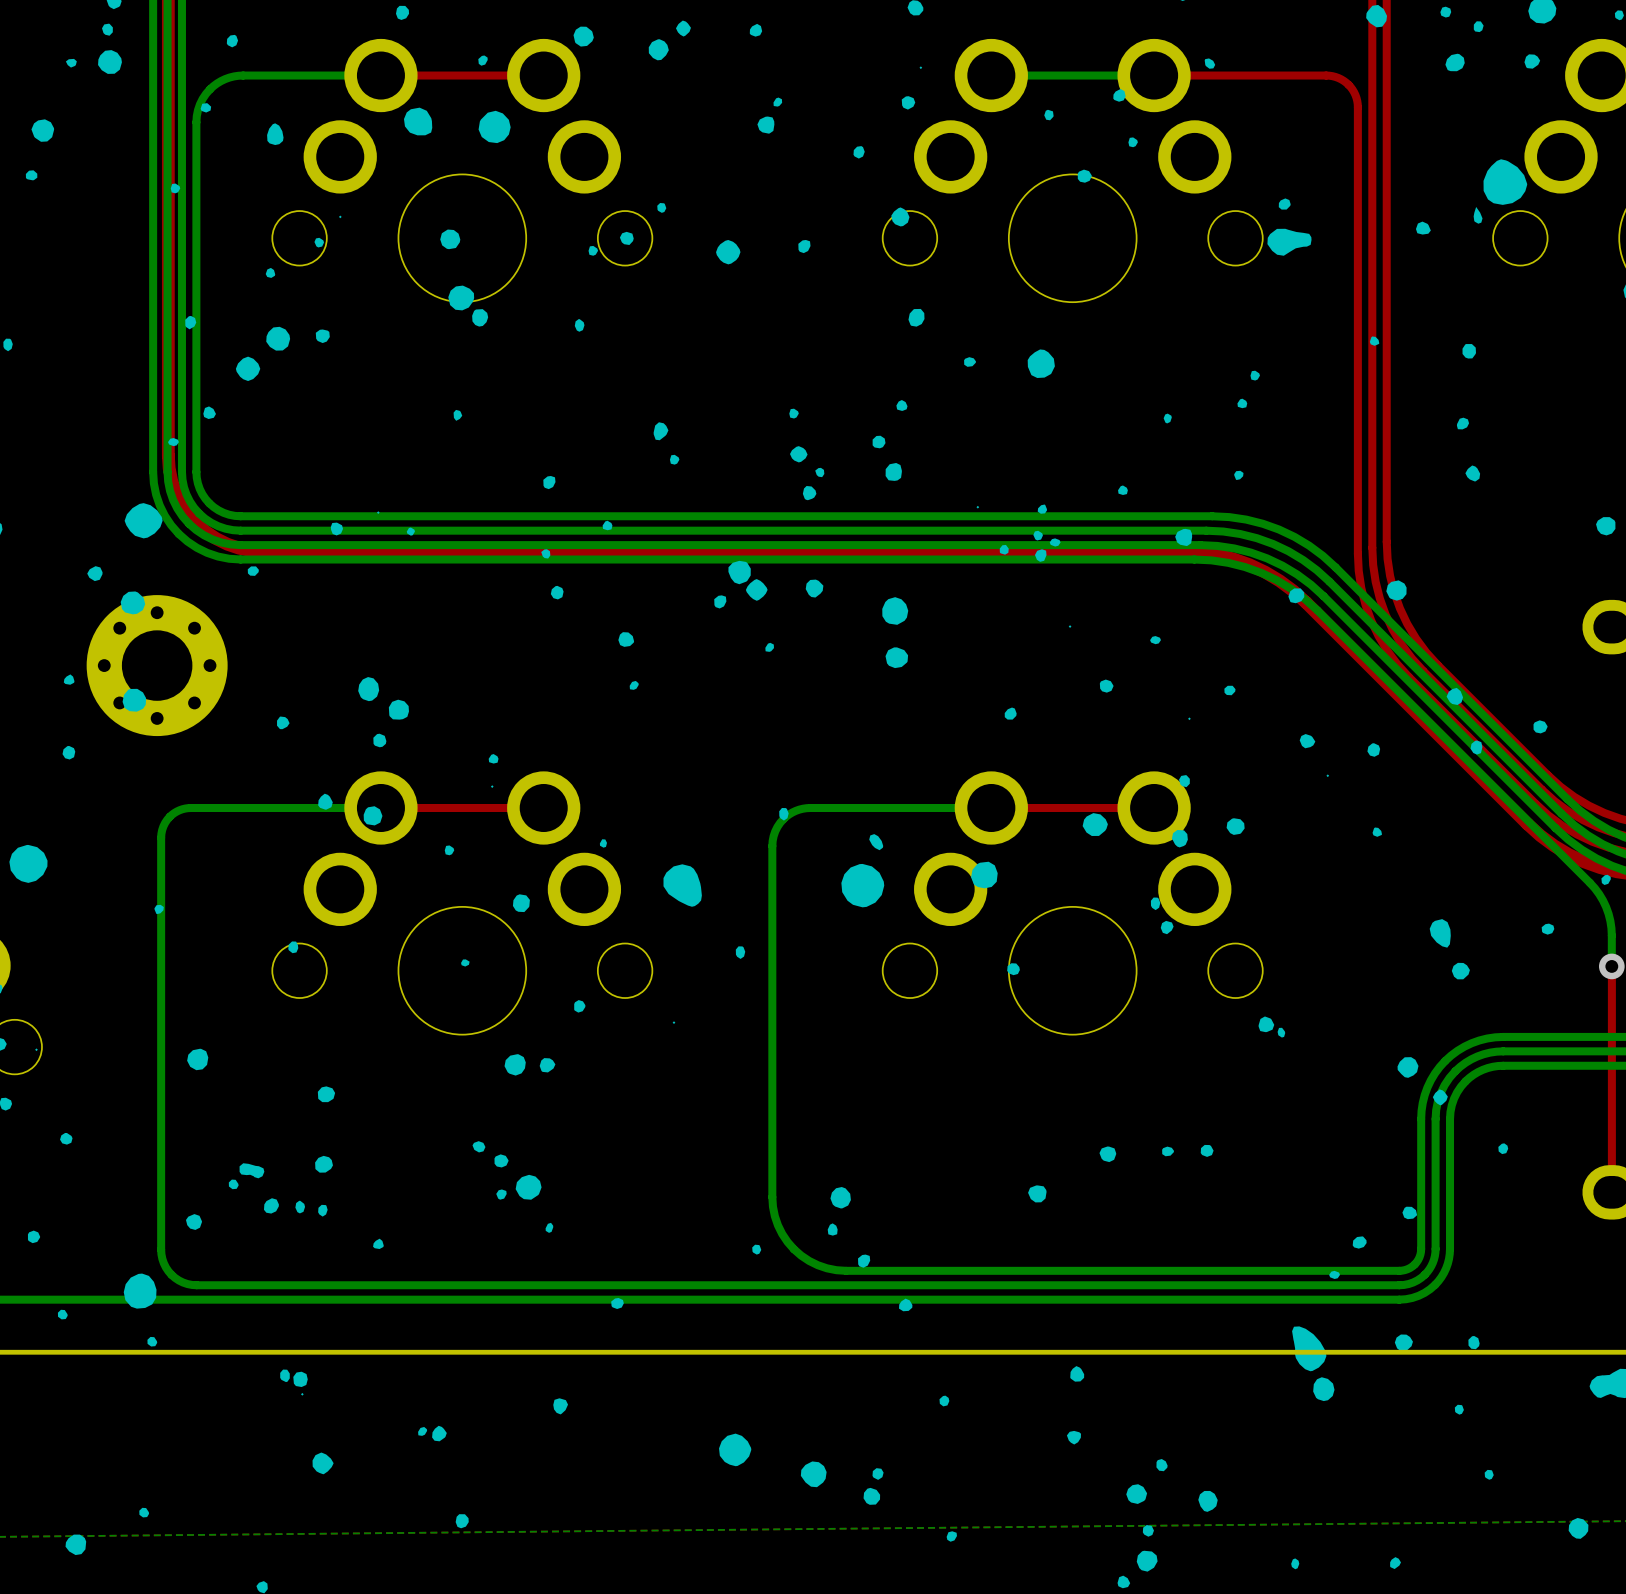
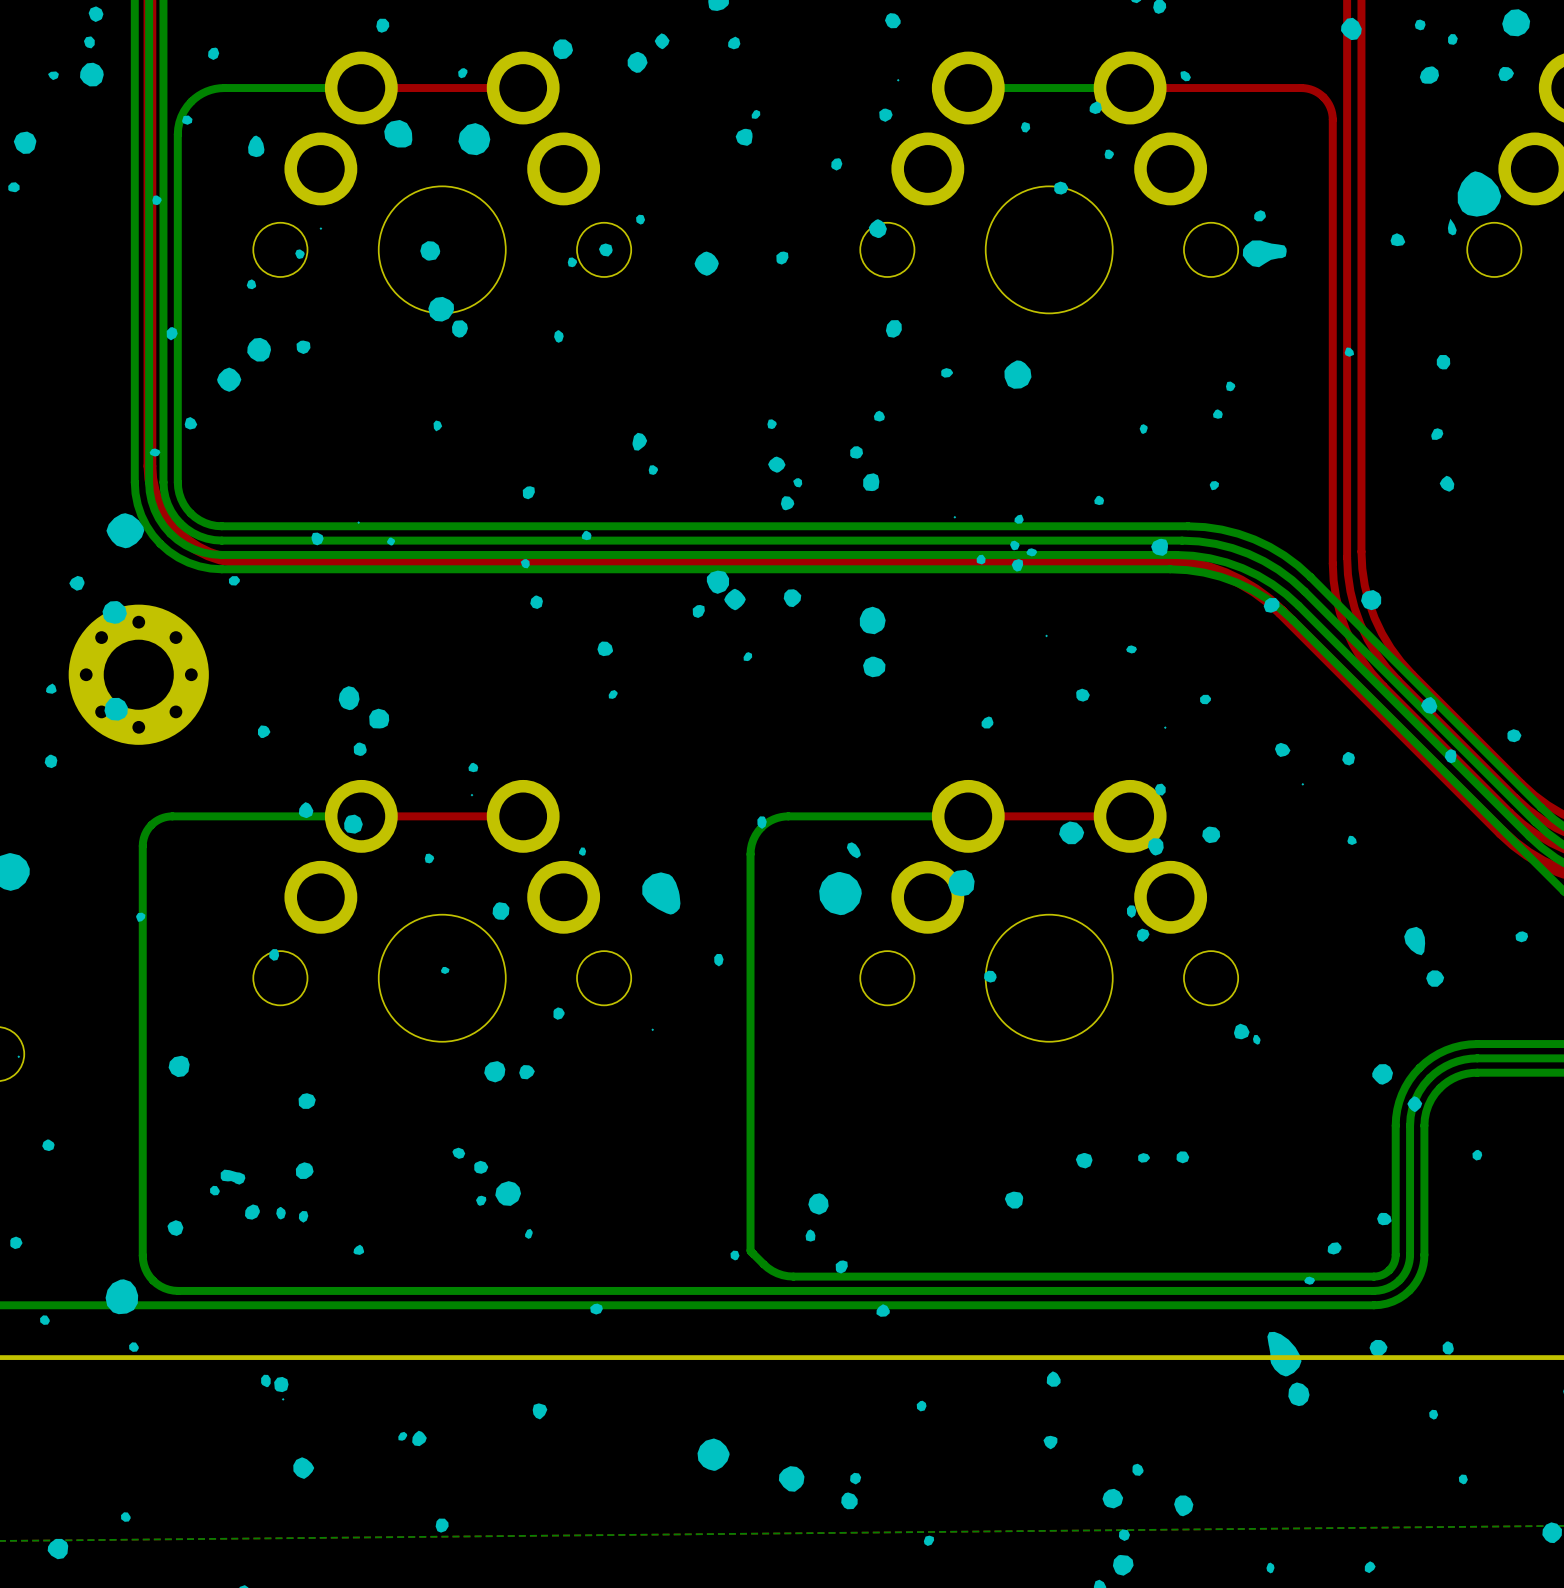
bottom track: (772, 1197) (777, 1225) (793, 1249) (817, 1265) (846, 1270) -> (752, 1253) (767, 1267) (782, 1275) (823, 1276)
bottom track: none -> (750, 1203) (750, 1250) (752, 1252)

